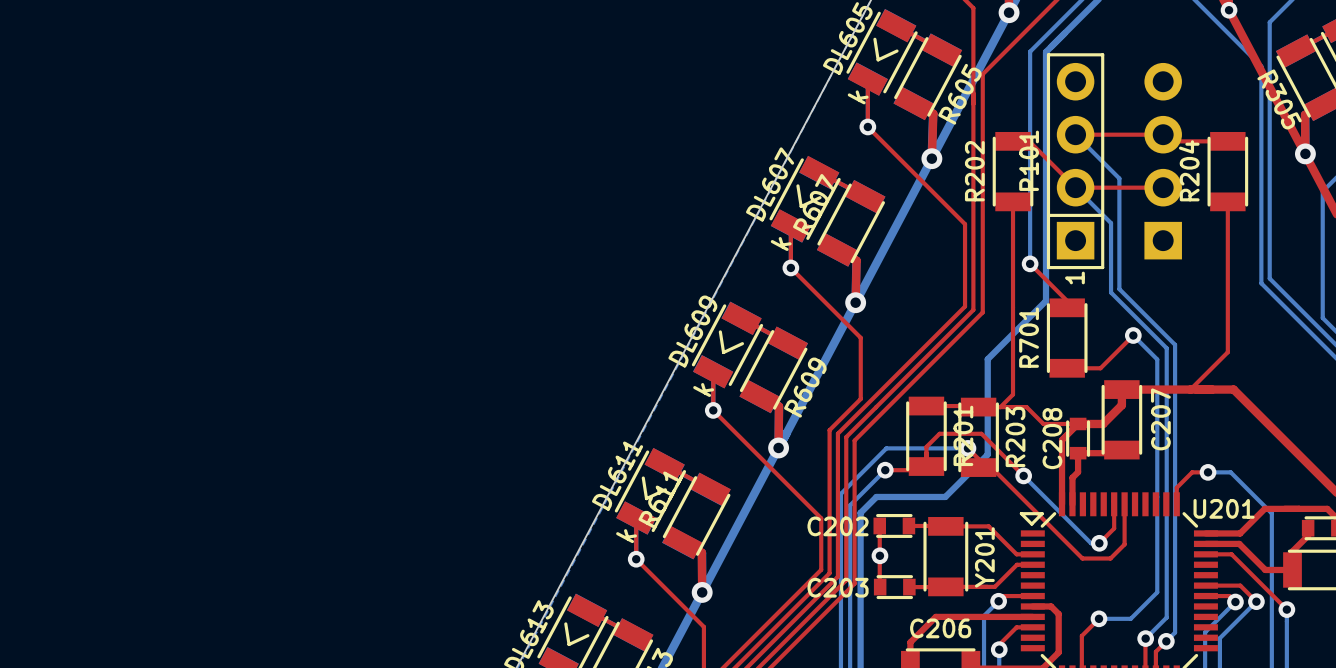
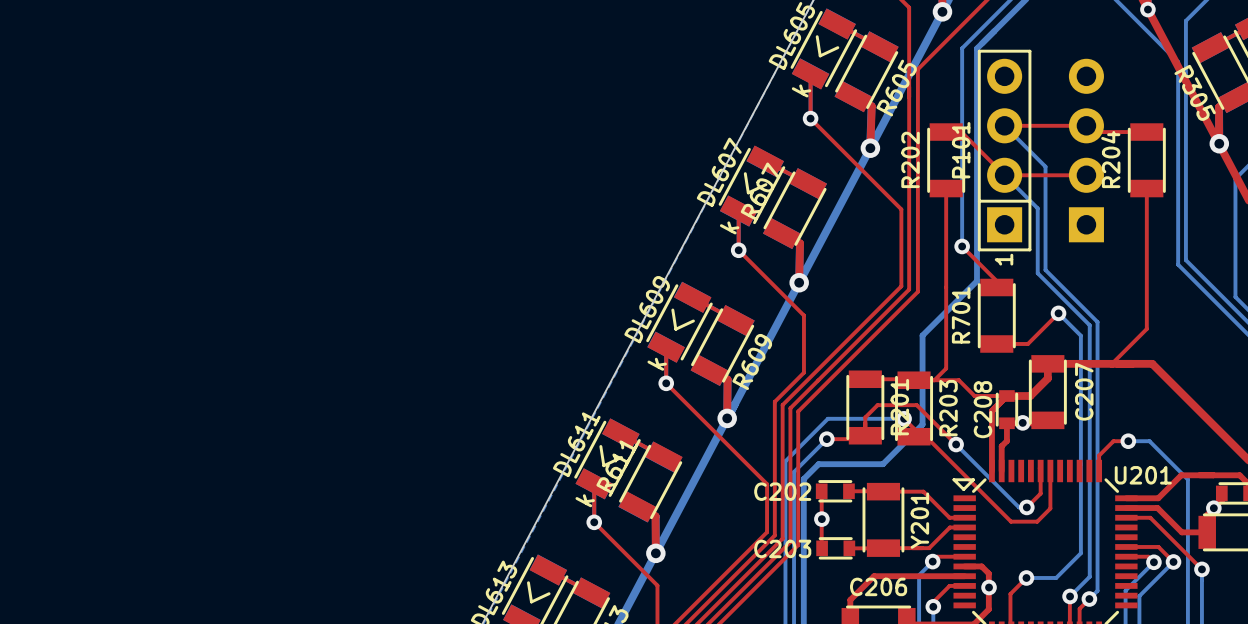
via: none -> (1022, 422)
via: none -> (1213, 508)
via: none -> (989, 587)

